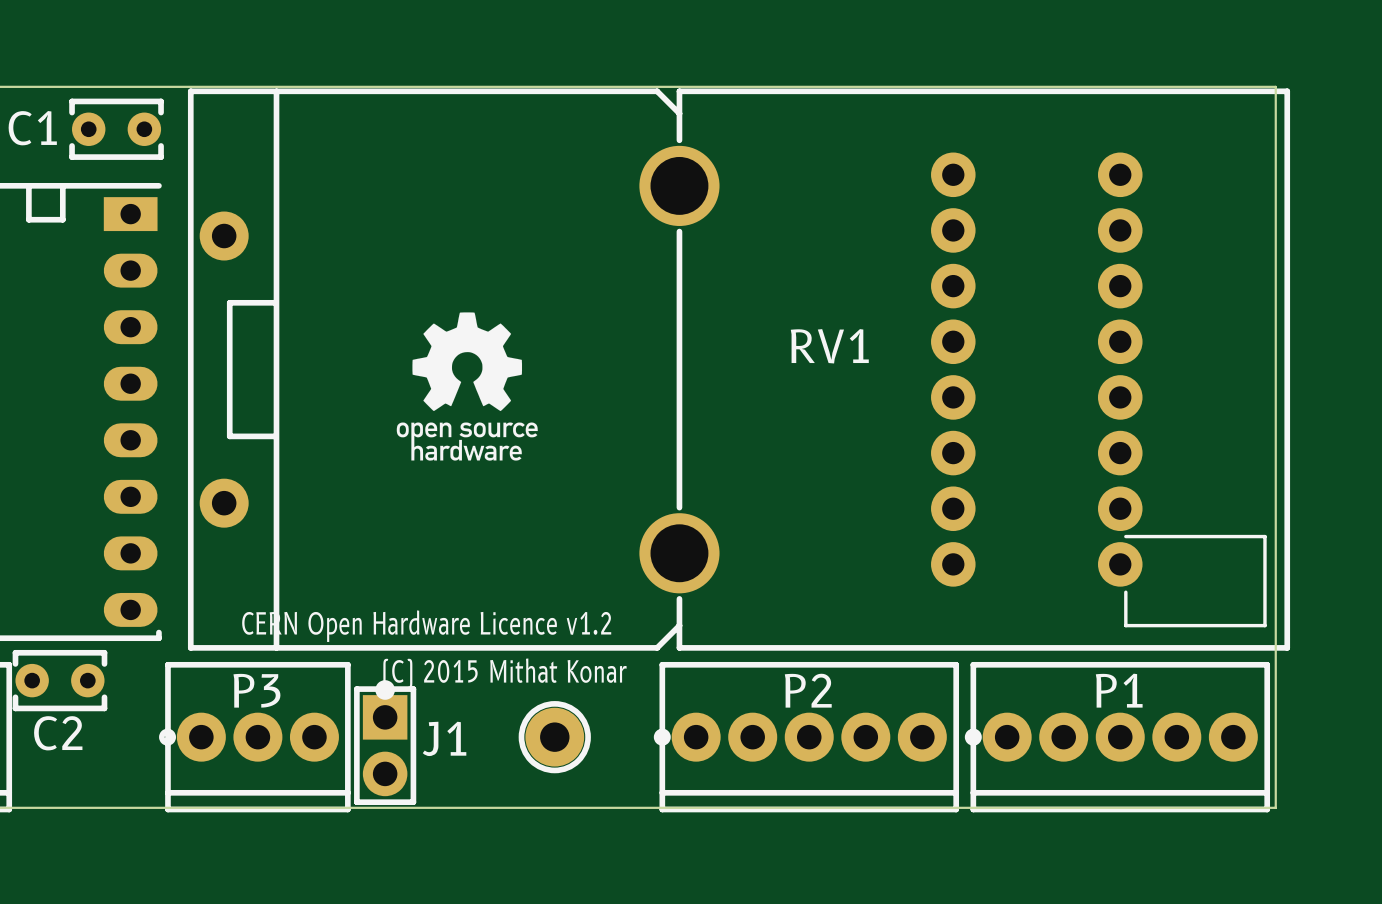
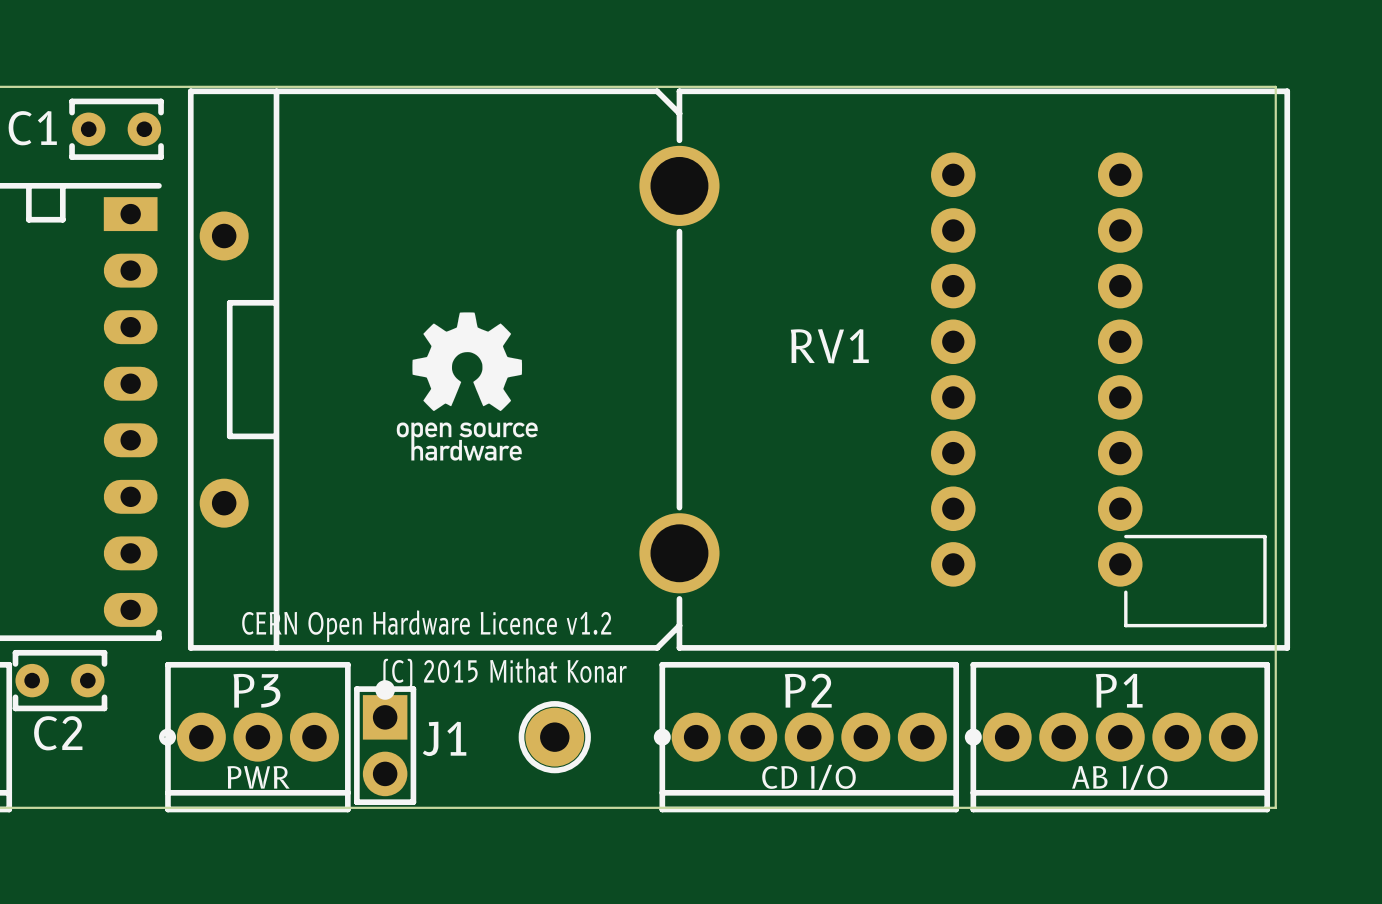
P3 value: none -> PWR (258, 777)
P2 value: none -> CD I/O (808, 777)
P1 value: none -> AB I/O (1119, 777)

